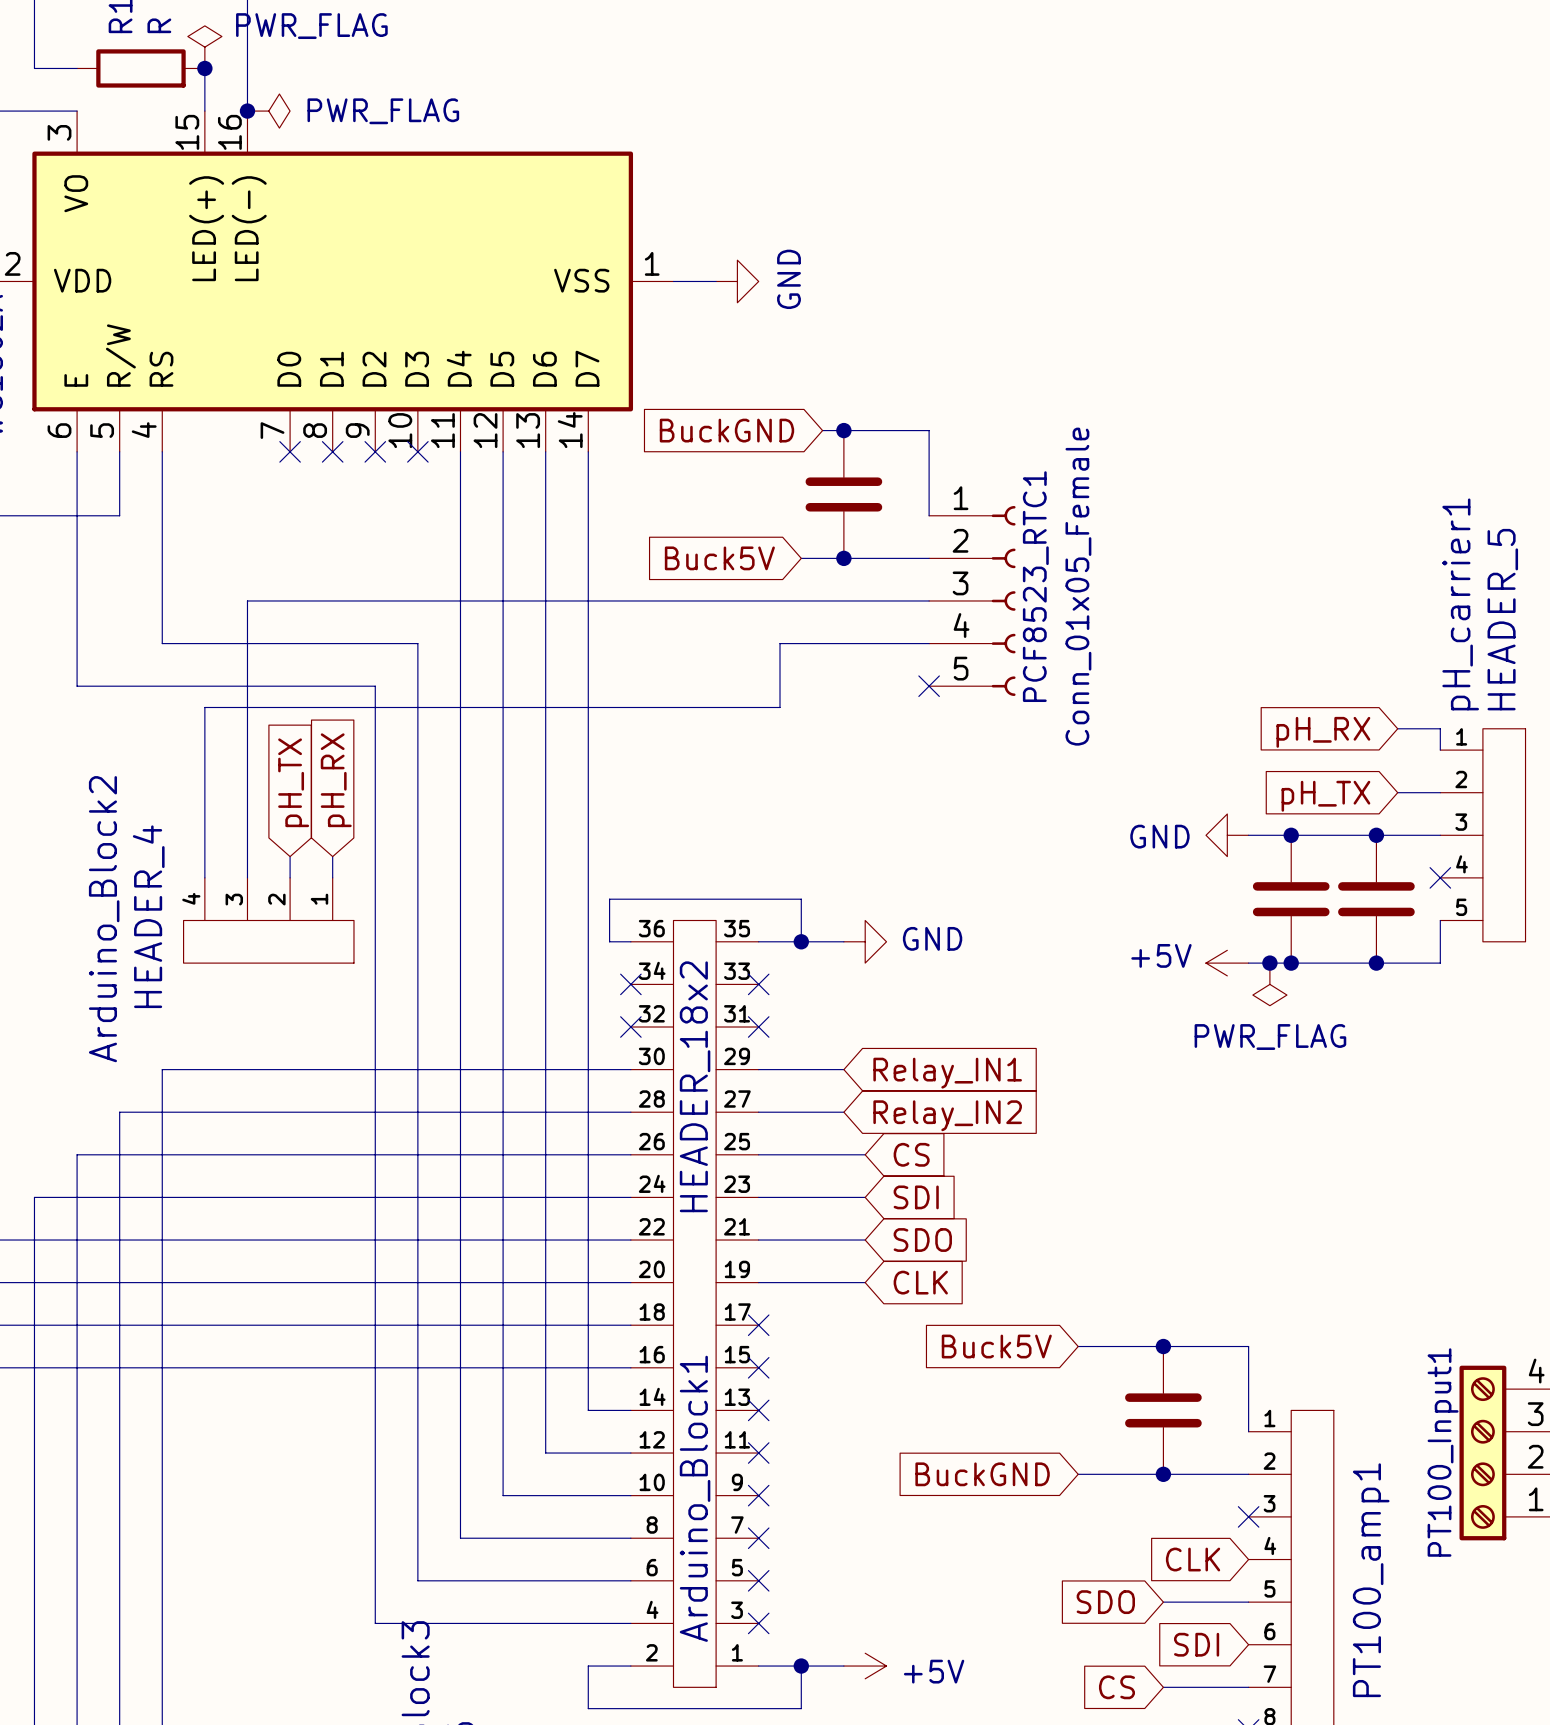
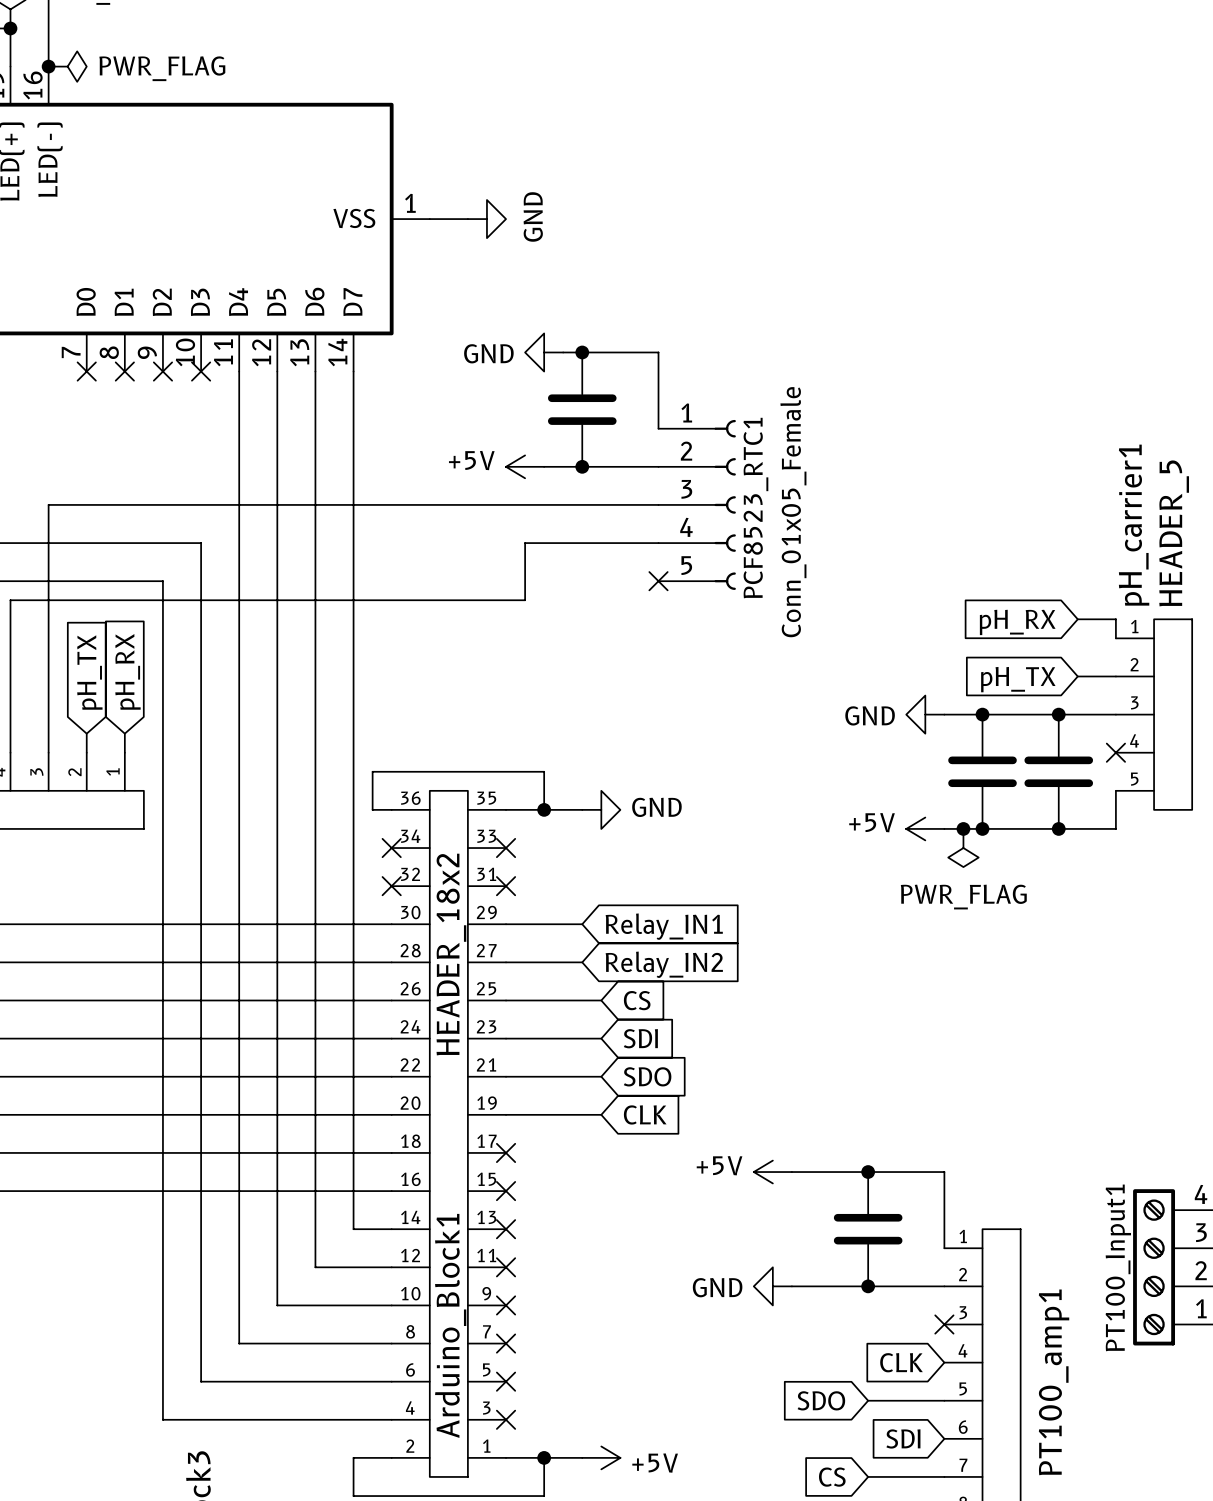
global label: BuckGND (726, 430) -> none
power symbol: none -> GND (544, 352)
global label: Buck5V (719, 558) -> none
power symbol: none -> +5V (525, 466)
global label: Buck5V (996, 1346) -> none
power symbol: none -> +5V (772, 1172)
global label: BuckGND (982, 1474) -> none
power symbol: none -> GND (772, 1286)

